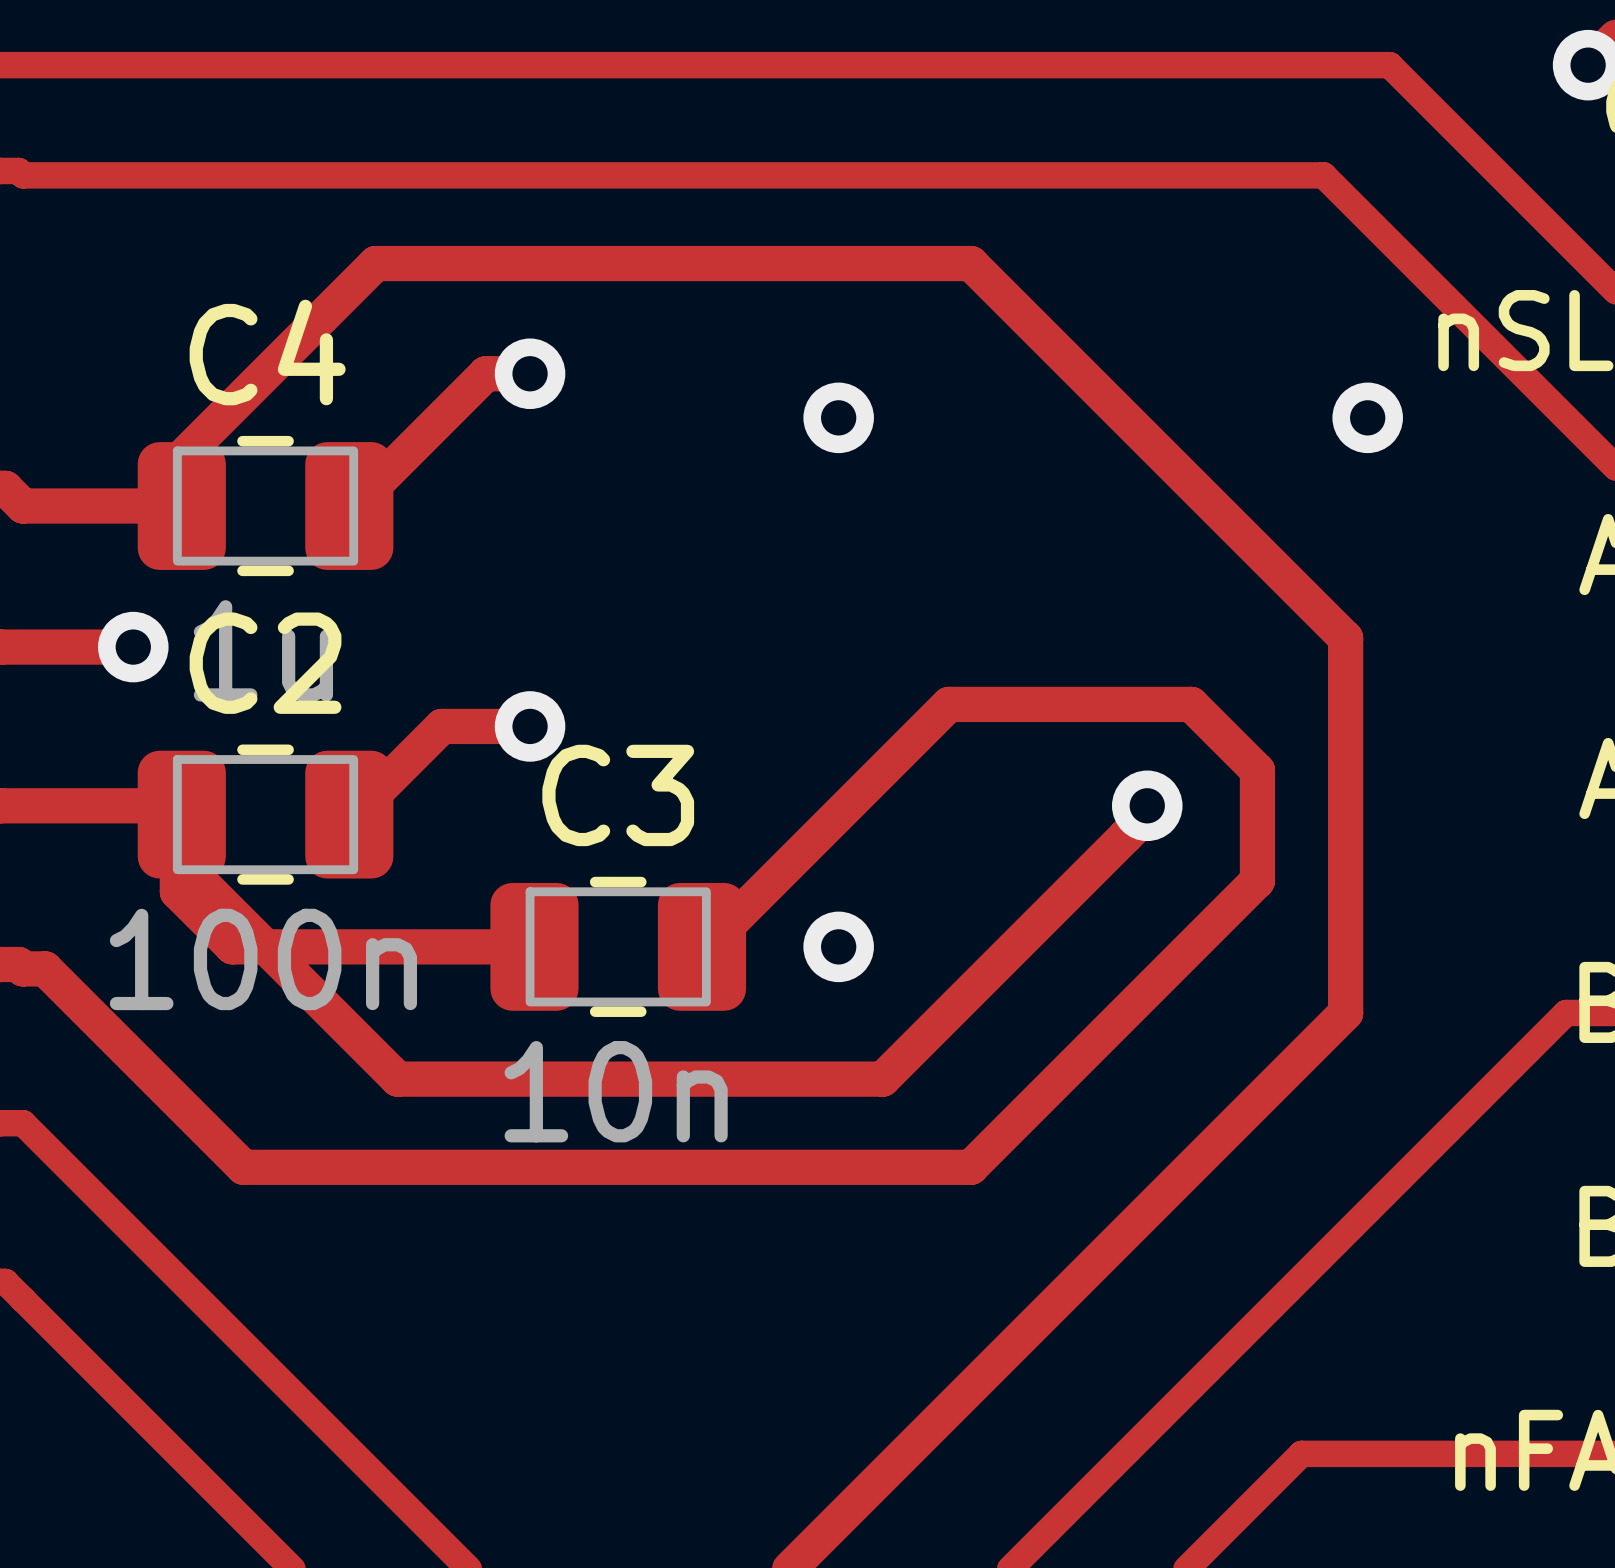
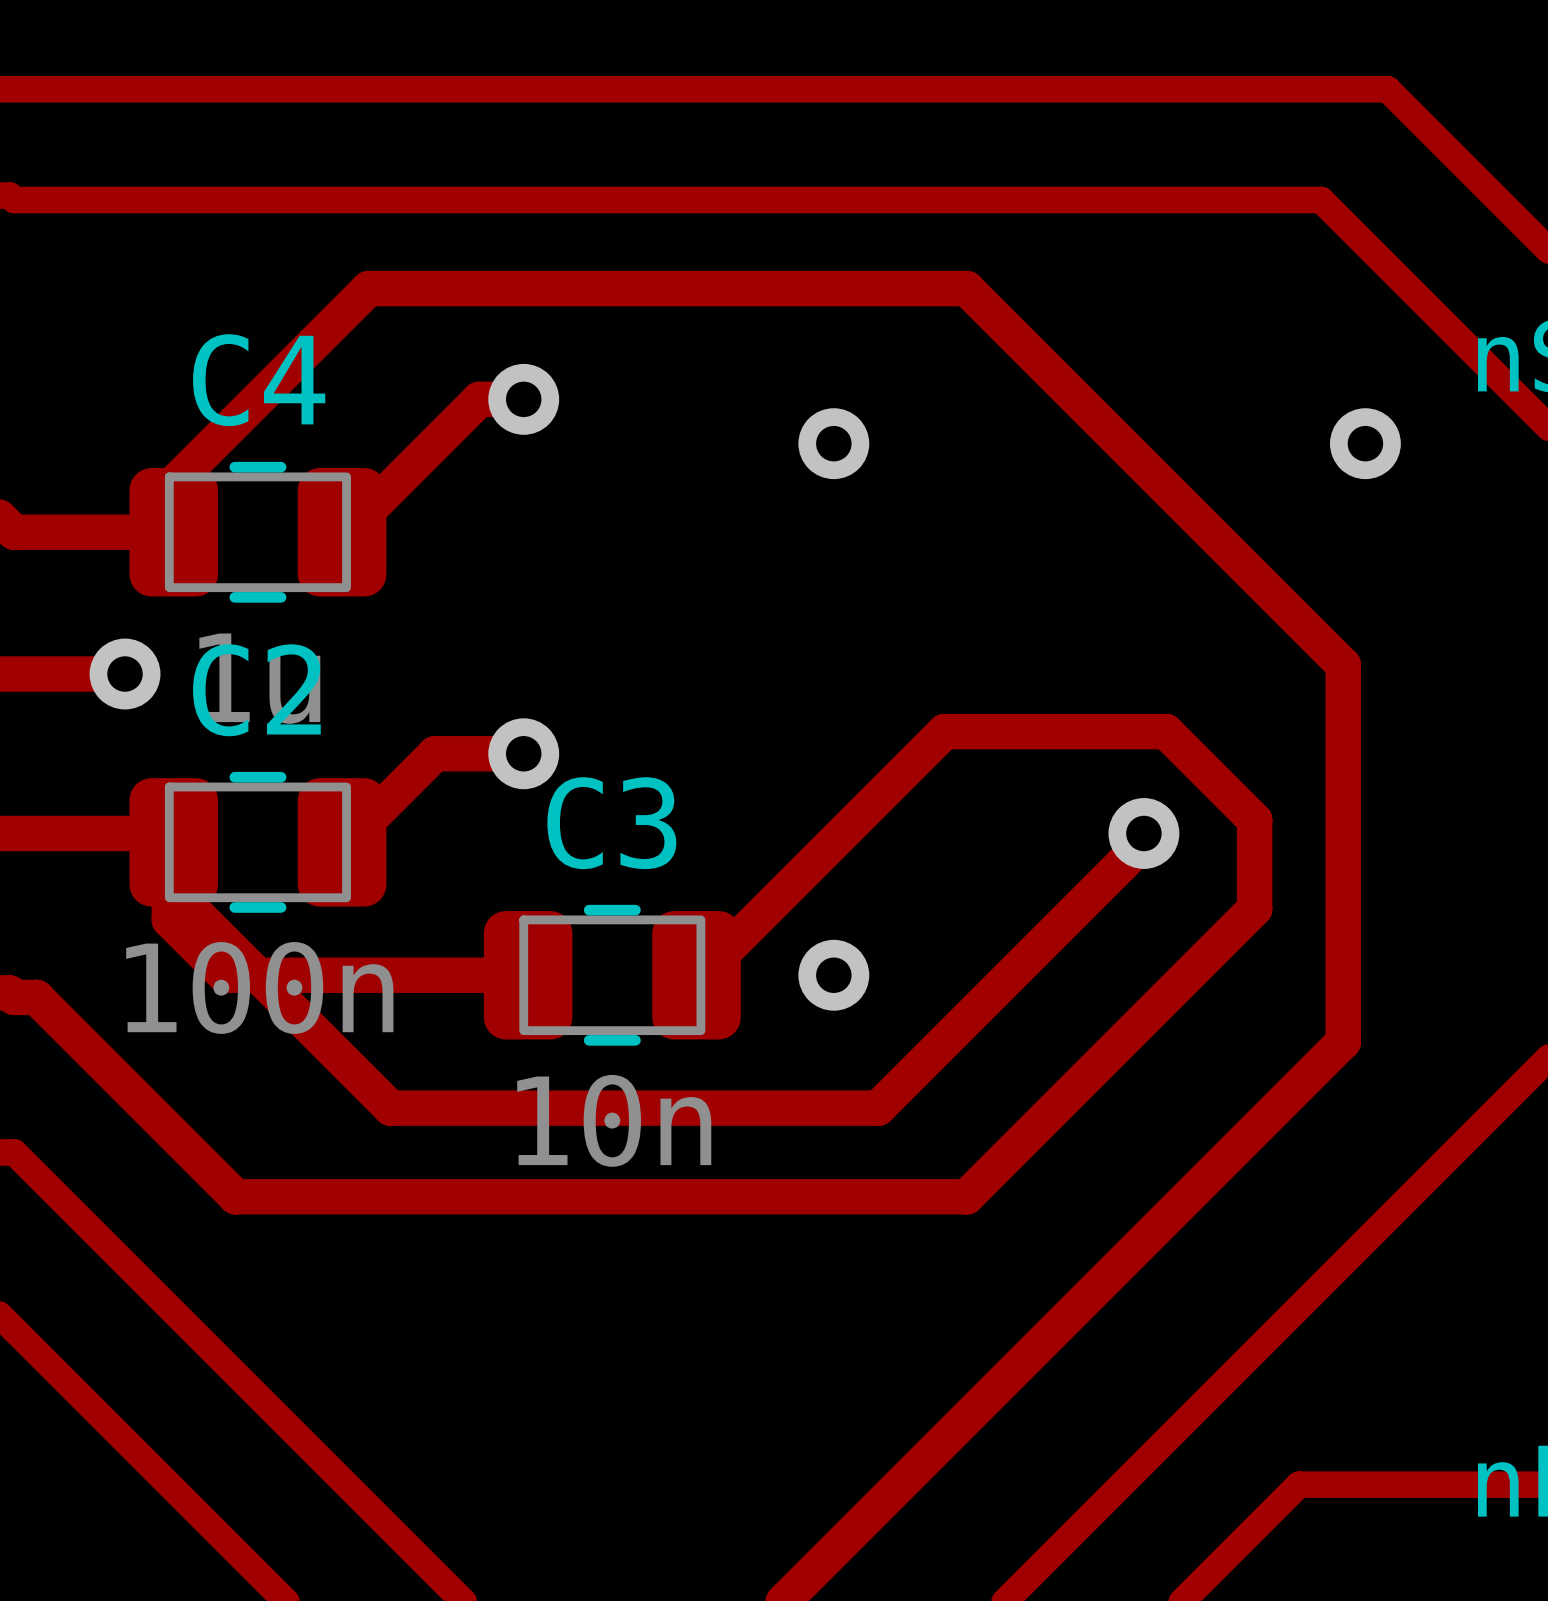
track: (1169, 704) (1191, 704) (1257, 770) (1257, 792) -> (1166, 731) (1254, 820)

